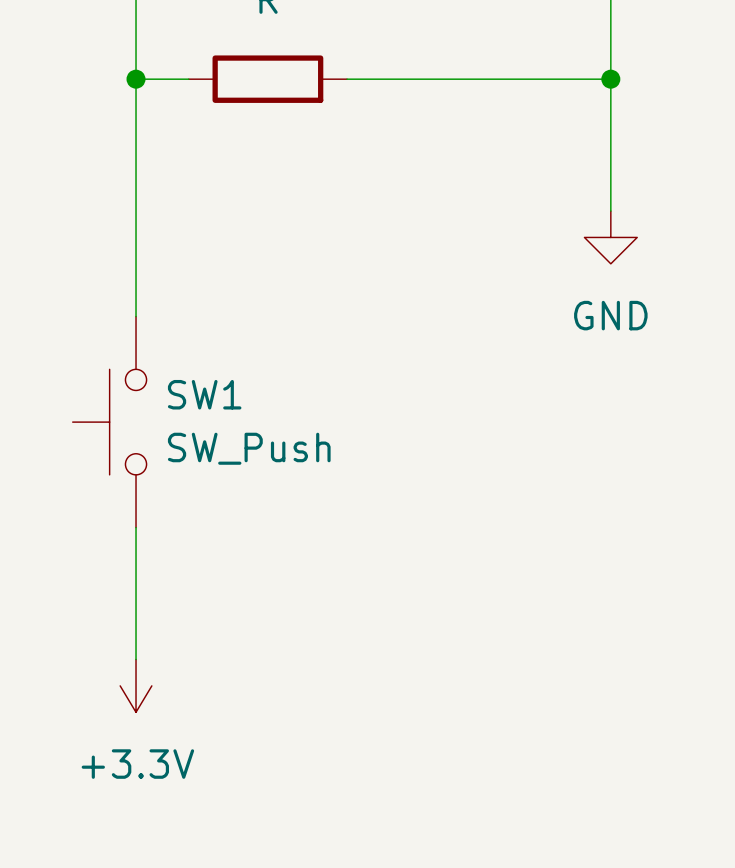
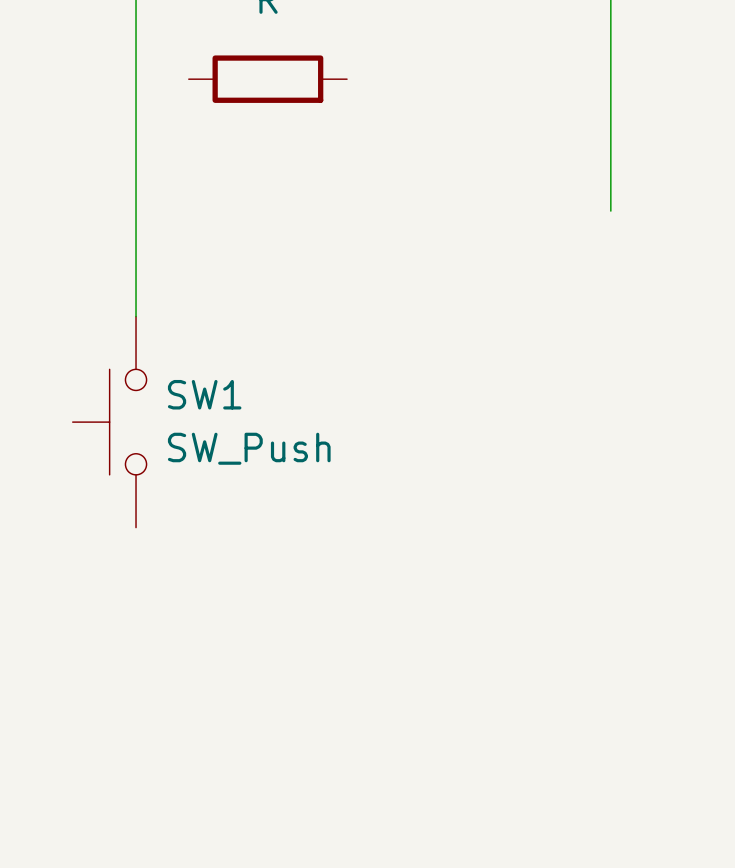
wire: (136, 79) (188, 79) -> none
junction: (136, 79) -> none
wire: (347, 79) (610, 79) -> none
junction: (610, 79) -> none
power symbol: GND (610, 237) -> none
wire: (136, 527) (136, 659) -> none
power symbol: +3.3V (136, 685) -> none

